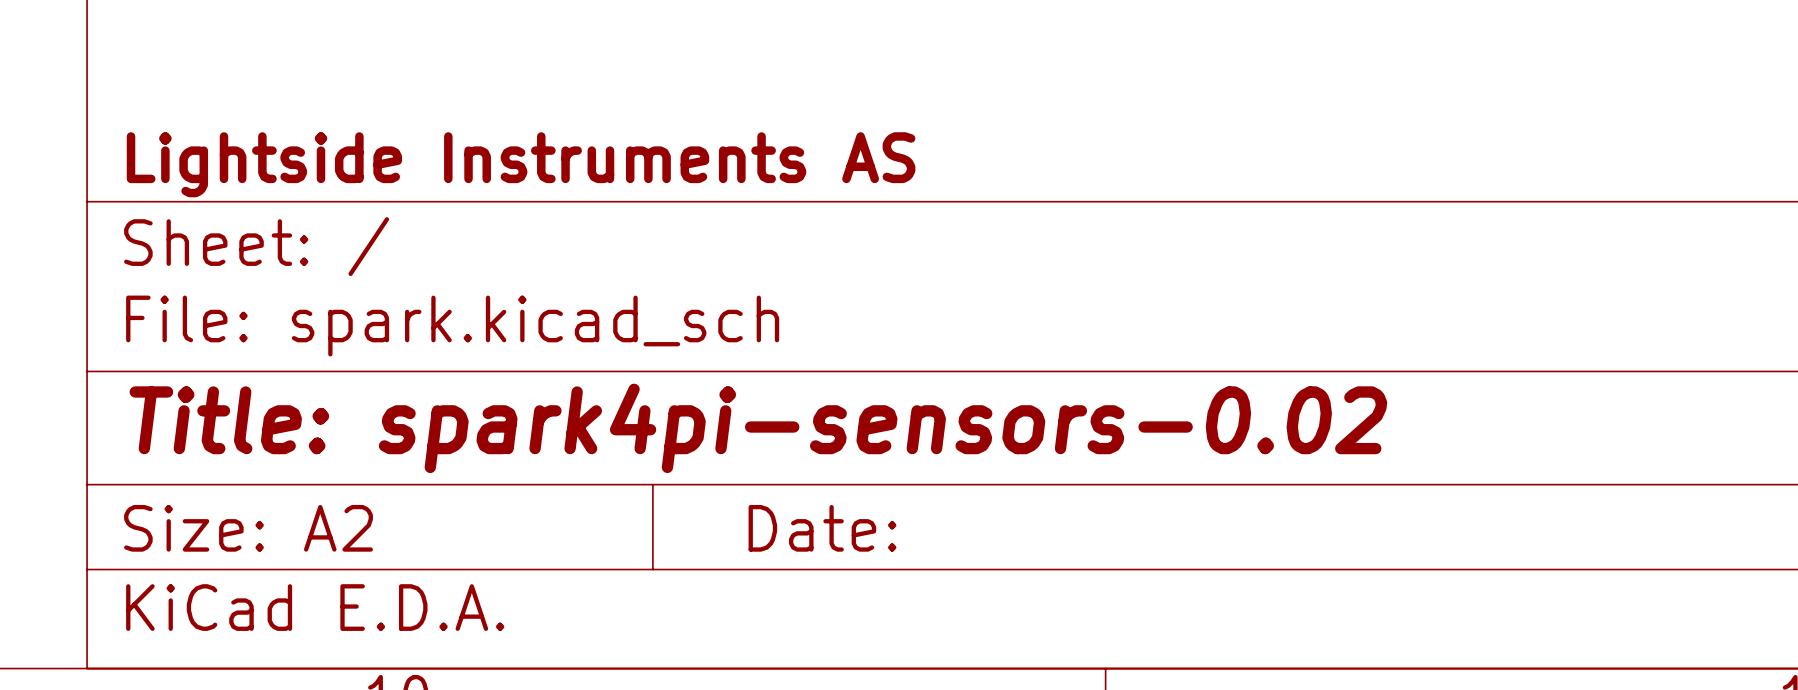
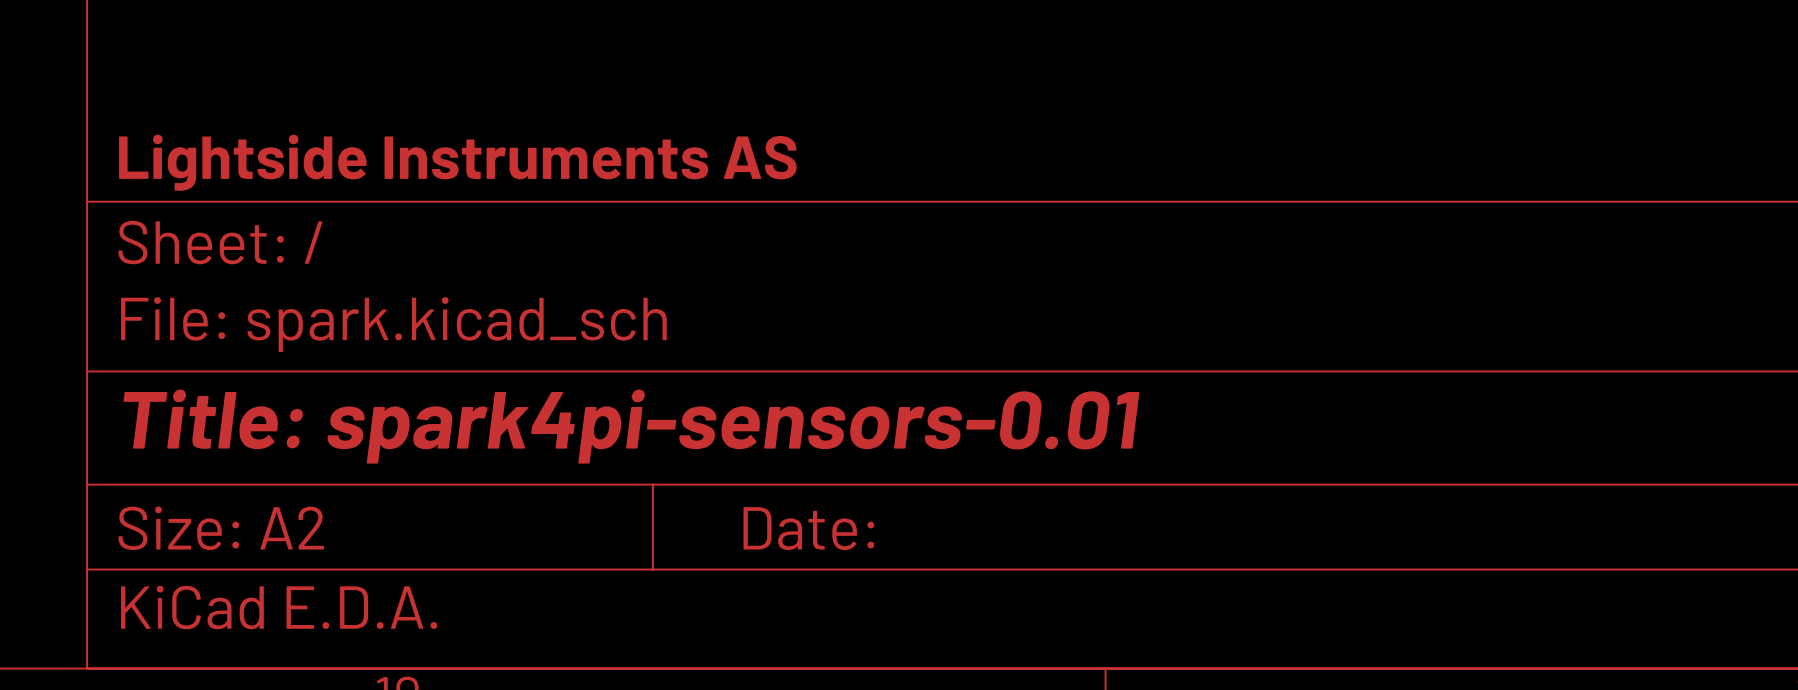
title block: Title: spark4pi-sensors-0.02 (758, 428) -> Title: spark4pi-sensors-0.01 (631, 426)

